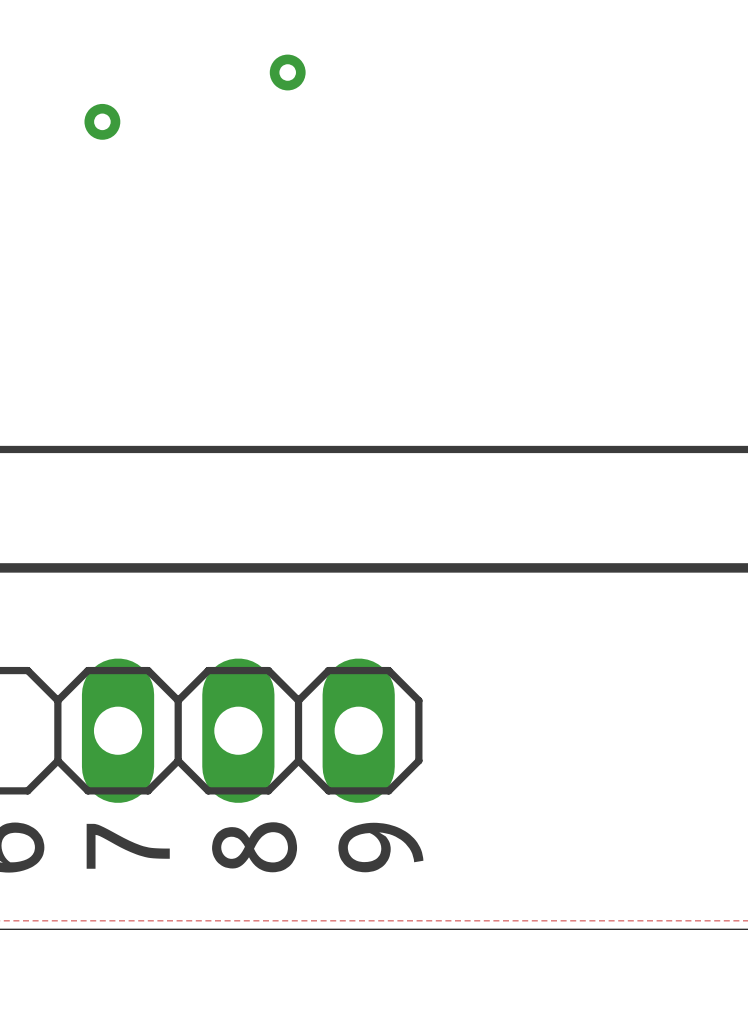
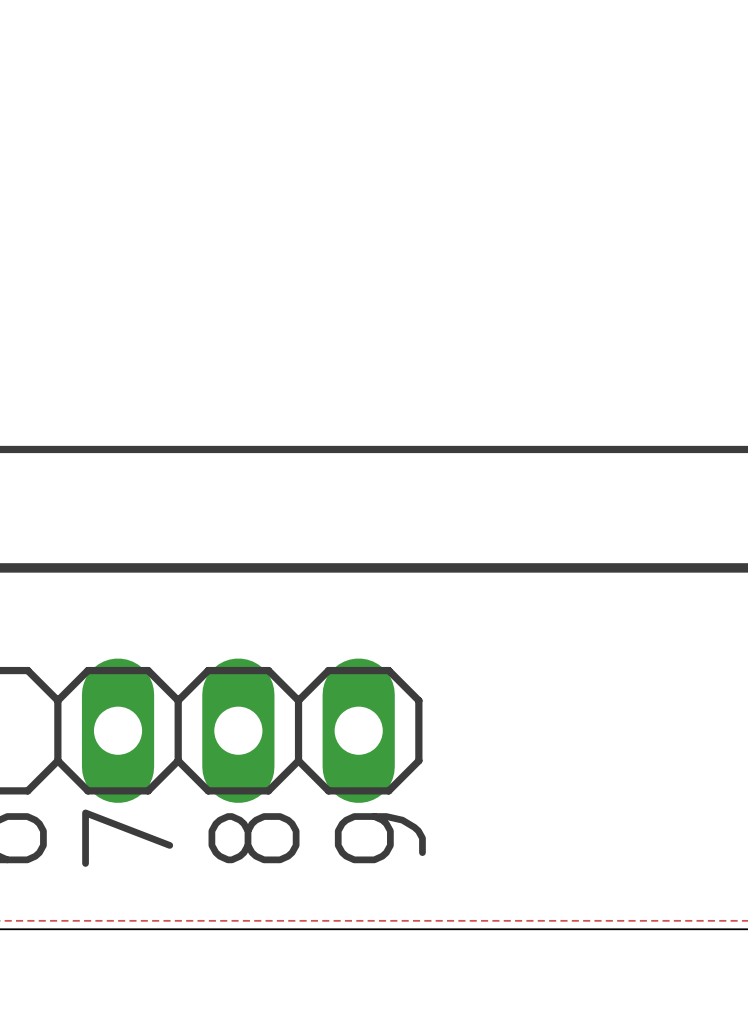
via: (287, 72) -> none
via: (102, 121) -> none

